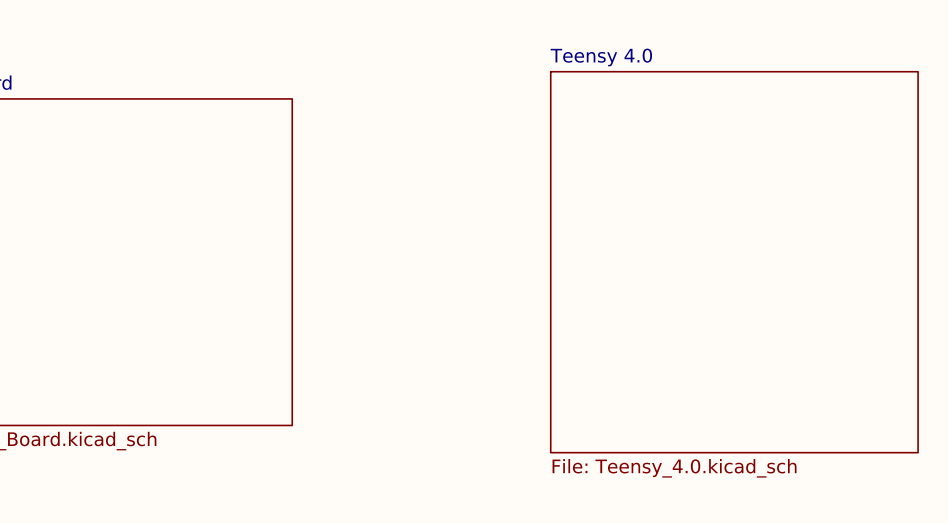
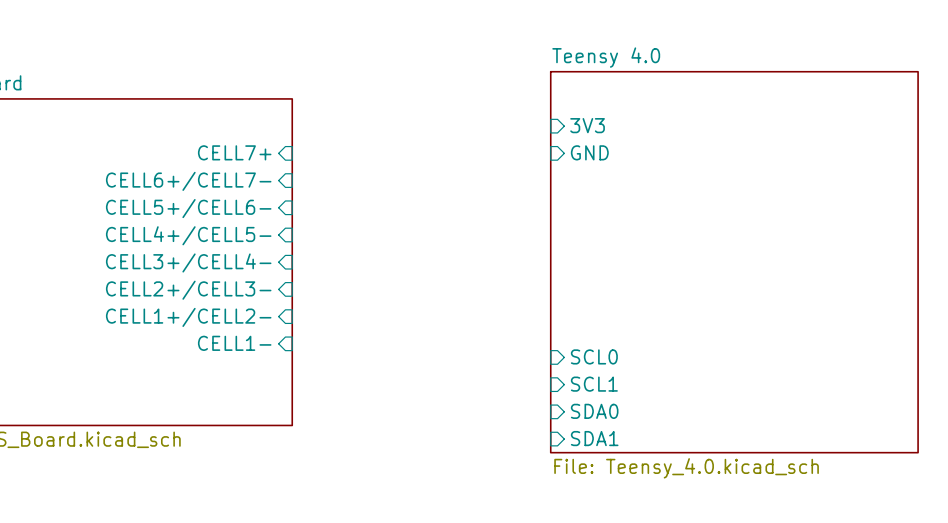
sheet pin: none -> 3V3 (587, 125)
sheet pin: none -> CELL7+ (234, 152)
sheet pin: none -> GND (589, 152)
sheet pin: none -> CELL6+/CELL7- (188, 181)
sheet pin: none -> CELL5+/CELL6- (188, 208)
sheet pin: none -> CELL4+/CELL5- (188, 235)
sheet pin: none -> CELL3+/CELL4- (188, 262)
sheet pin: none -> CELL2+/CELL3- (188, 290)
sheet pin: none -> CELL1+/CELL2- (188, 317)
sheet pin: none -> CELL1- (234, 343)
sheet pin: none -> SCL0 (594, 356)
sheet pin: none -> SCL1 (594, 384)
sheet pin: none -> SDA0 (594, 411)
sheet pin: none -> SDA1 (594, 438)

